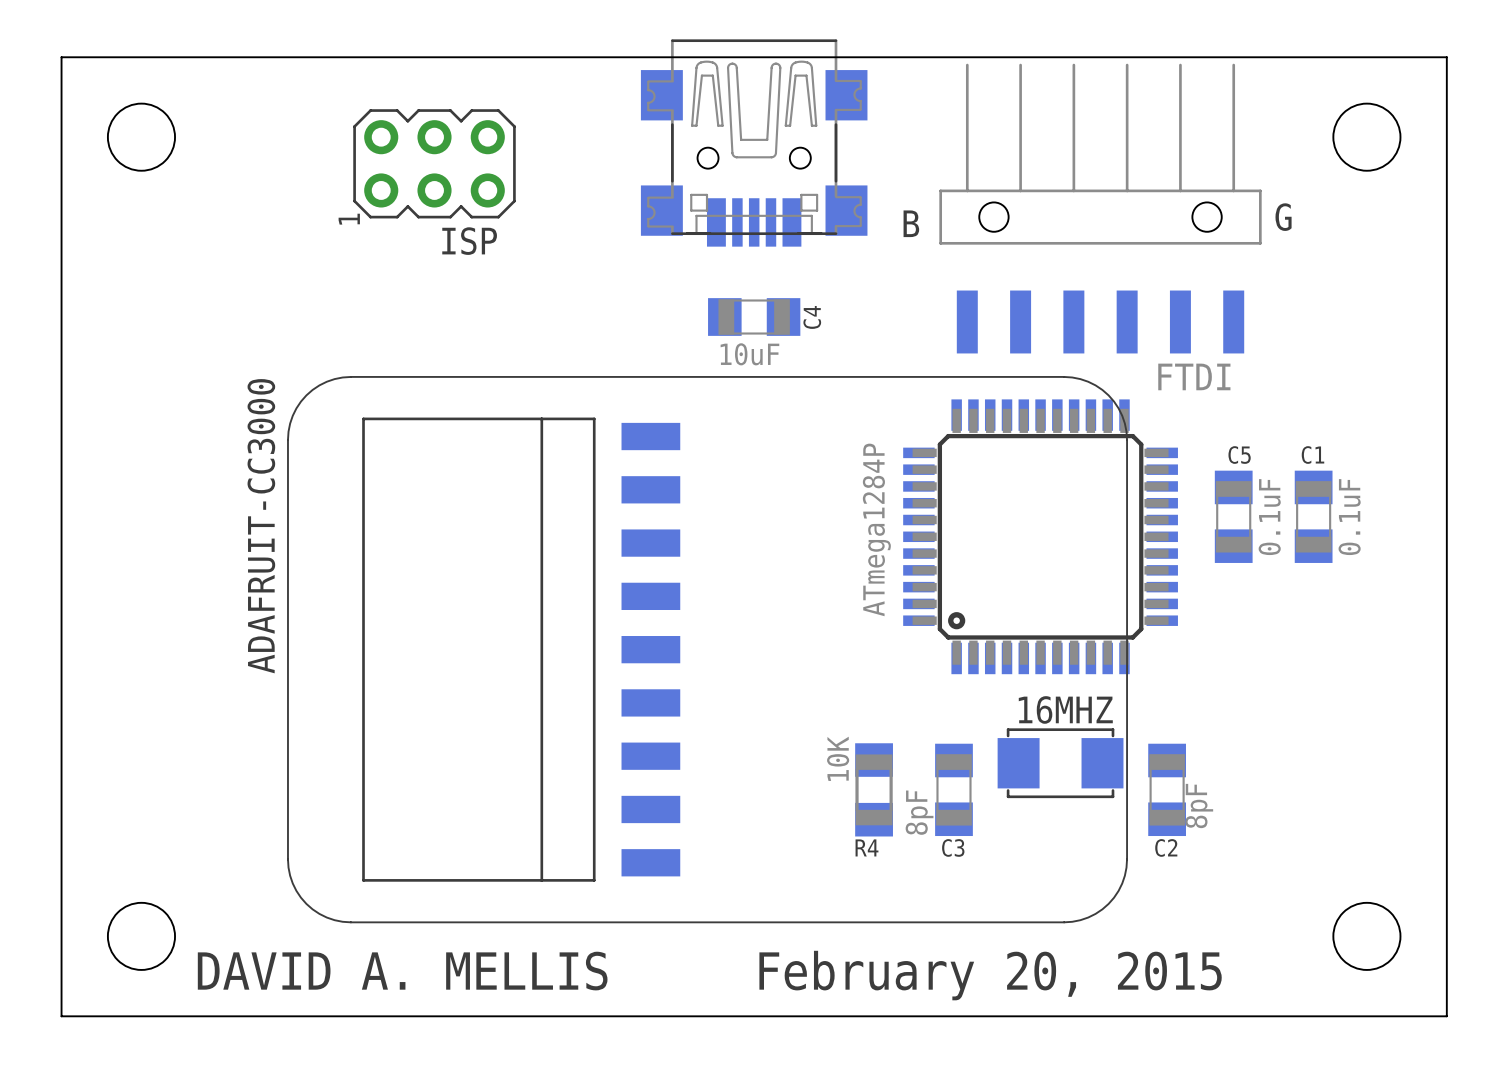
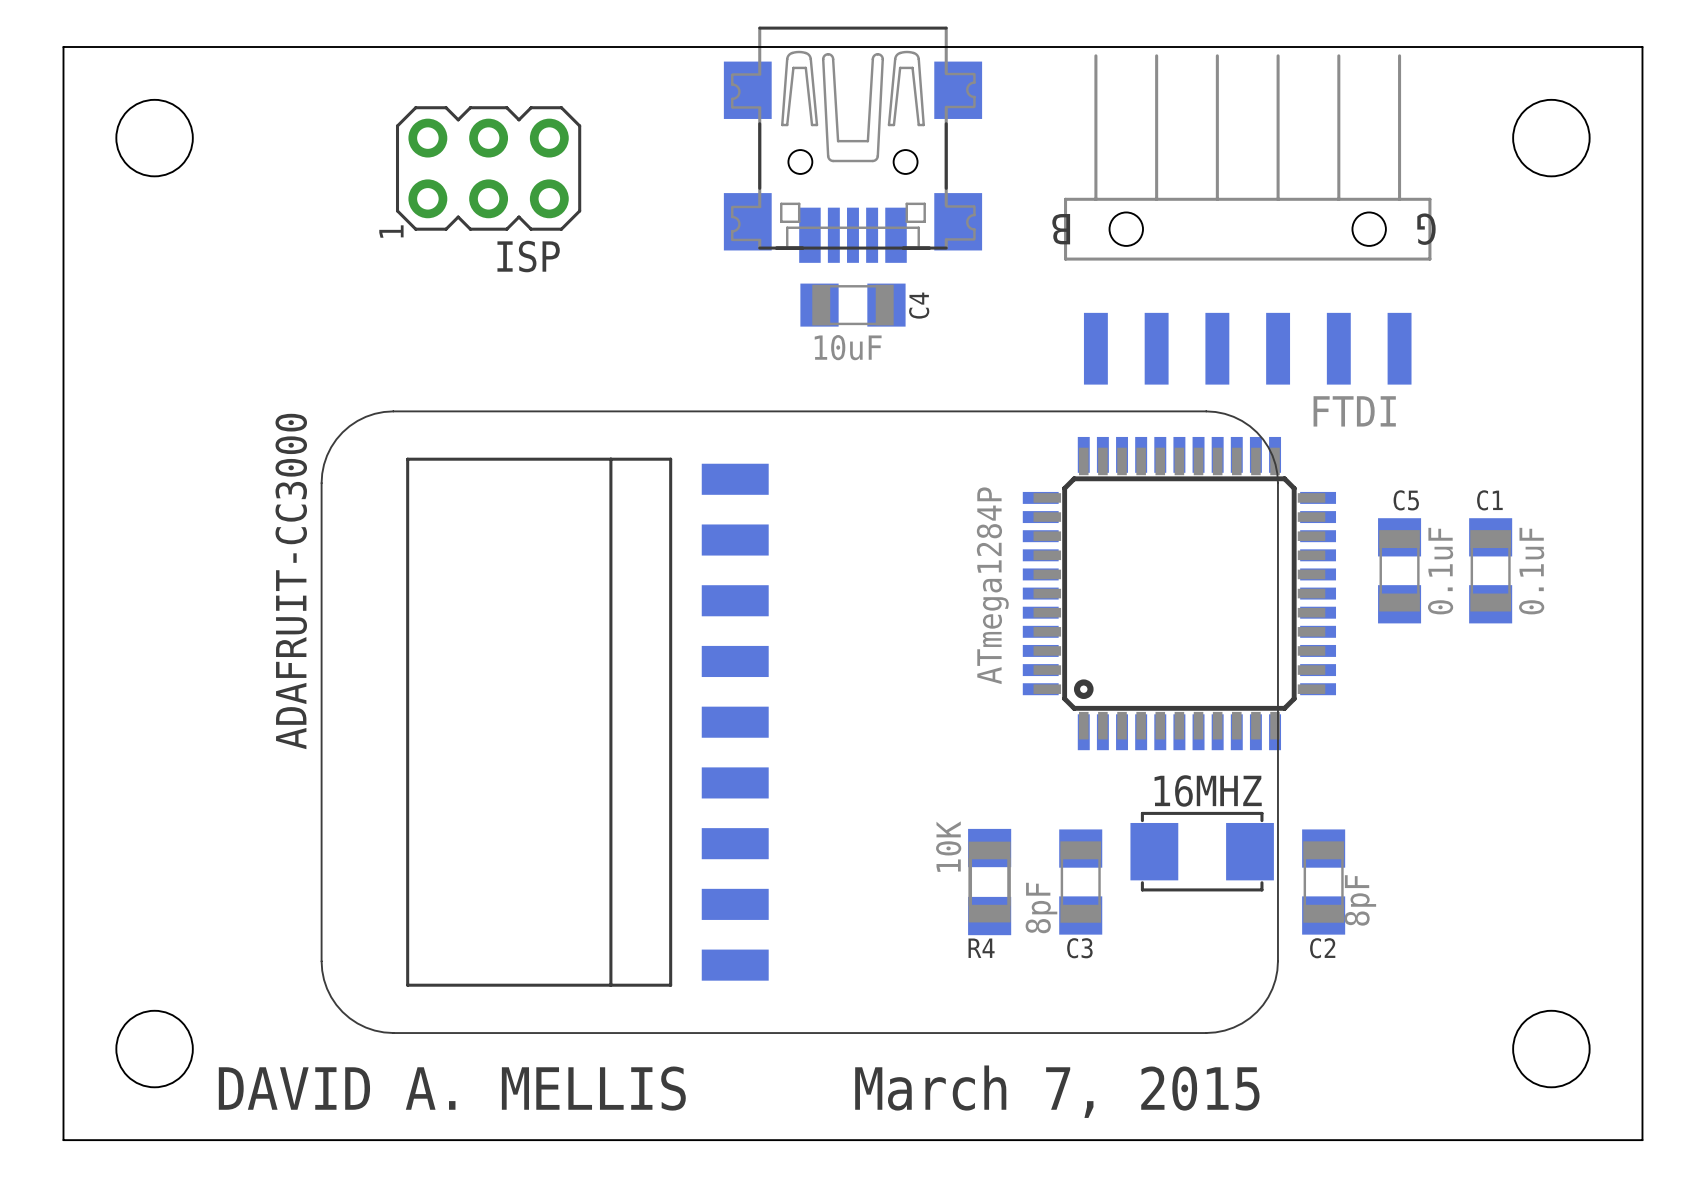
text rotation: 0° (1283, 217) -> 180° (1426, 229)
text rotation: 0° (911, 223) -> 180° (1061, 229)
C4 position: (754, 317) -> (852, 305)
text: February 20, 2015 (990, 975) -> March 7, 2015 (1057, 1091)

